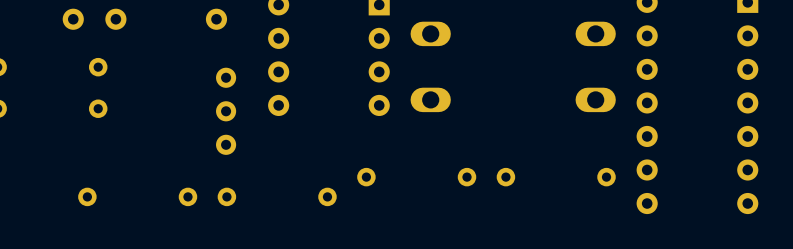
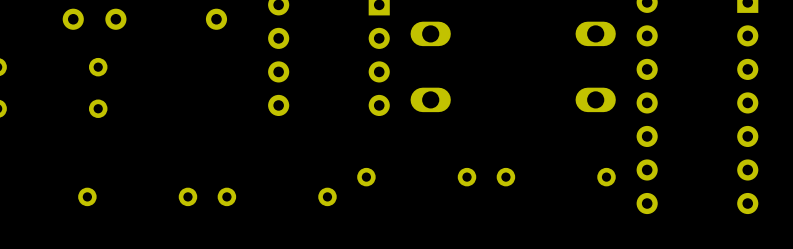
part: (226, 111) -> none

